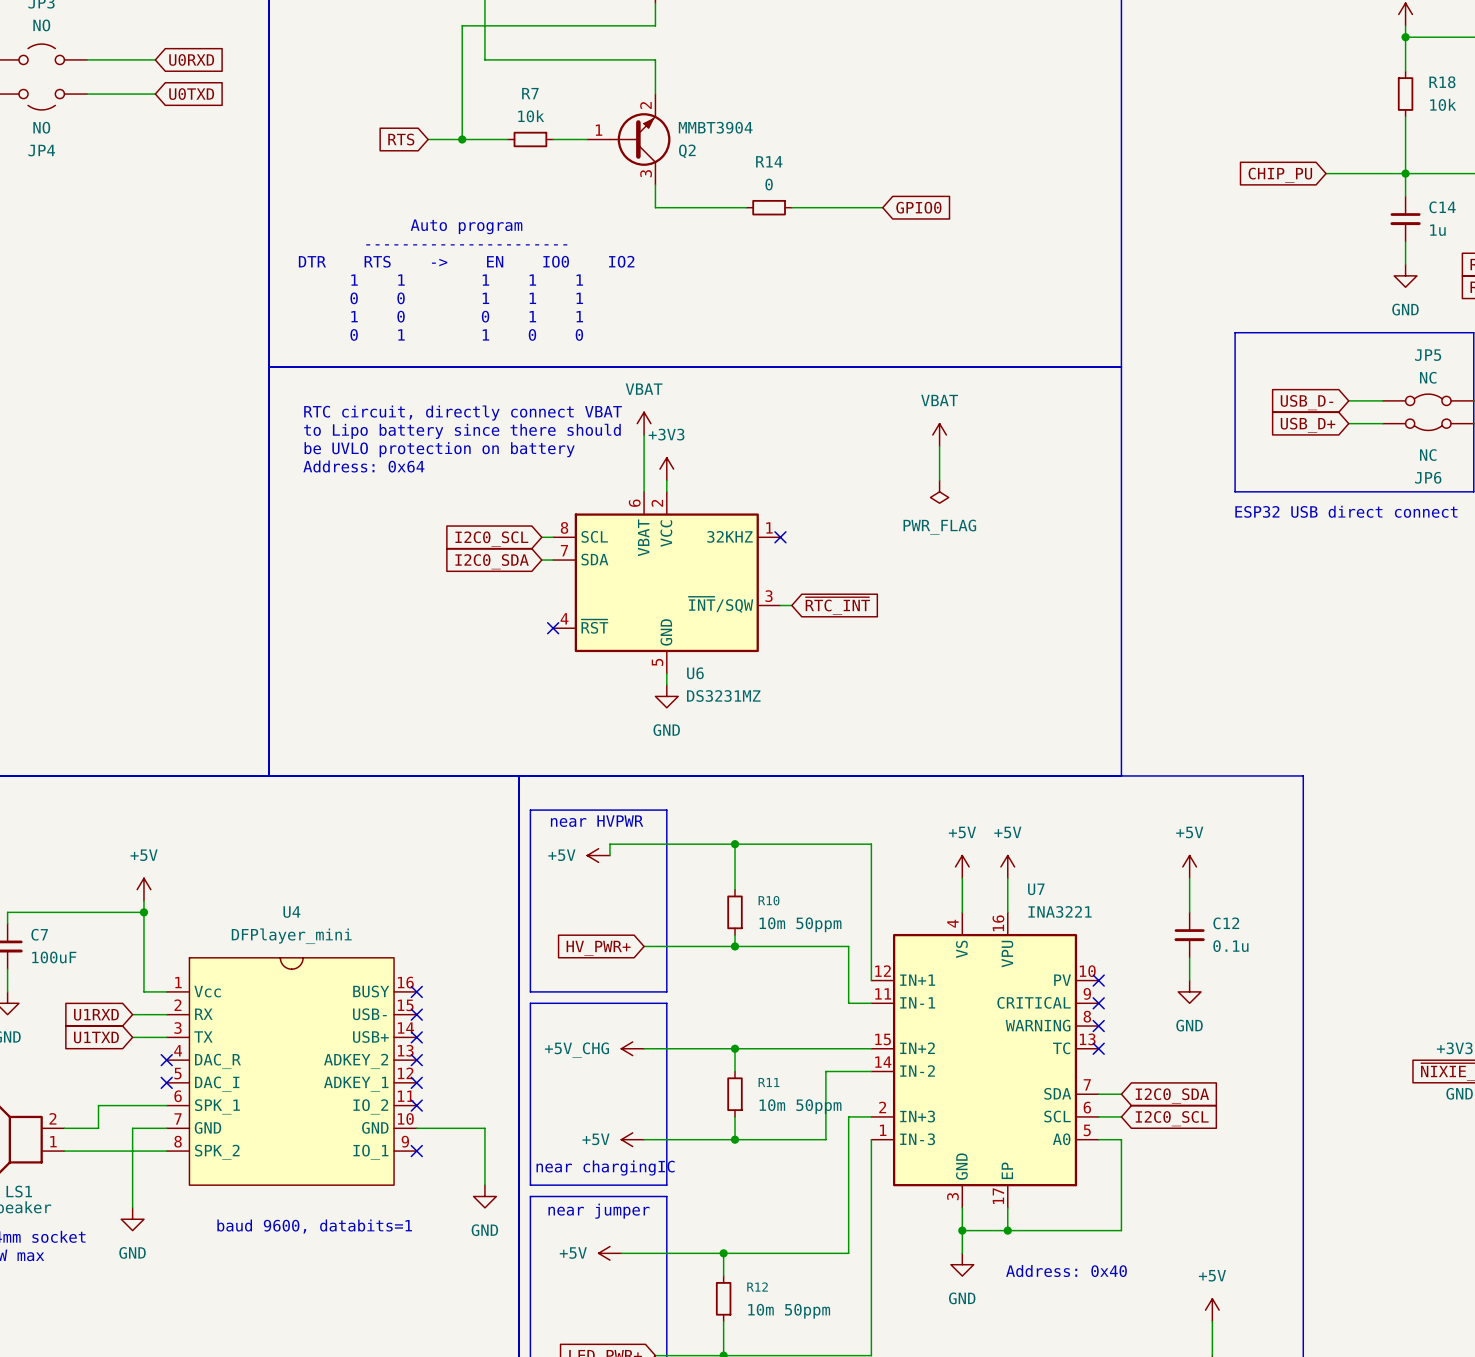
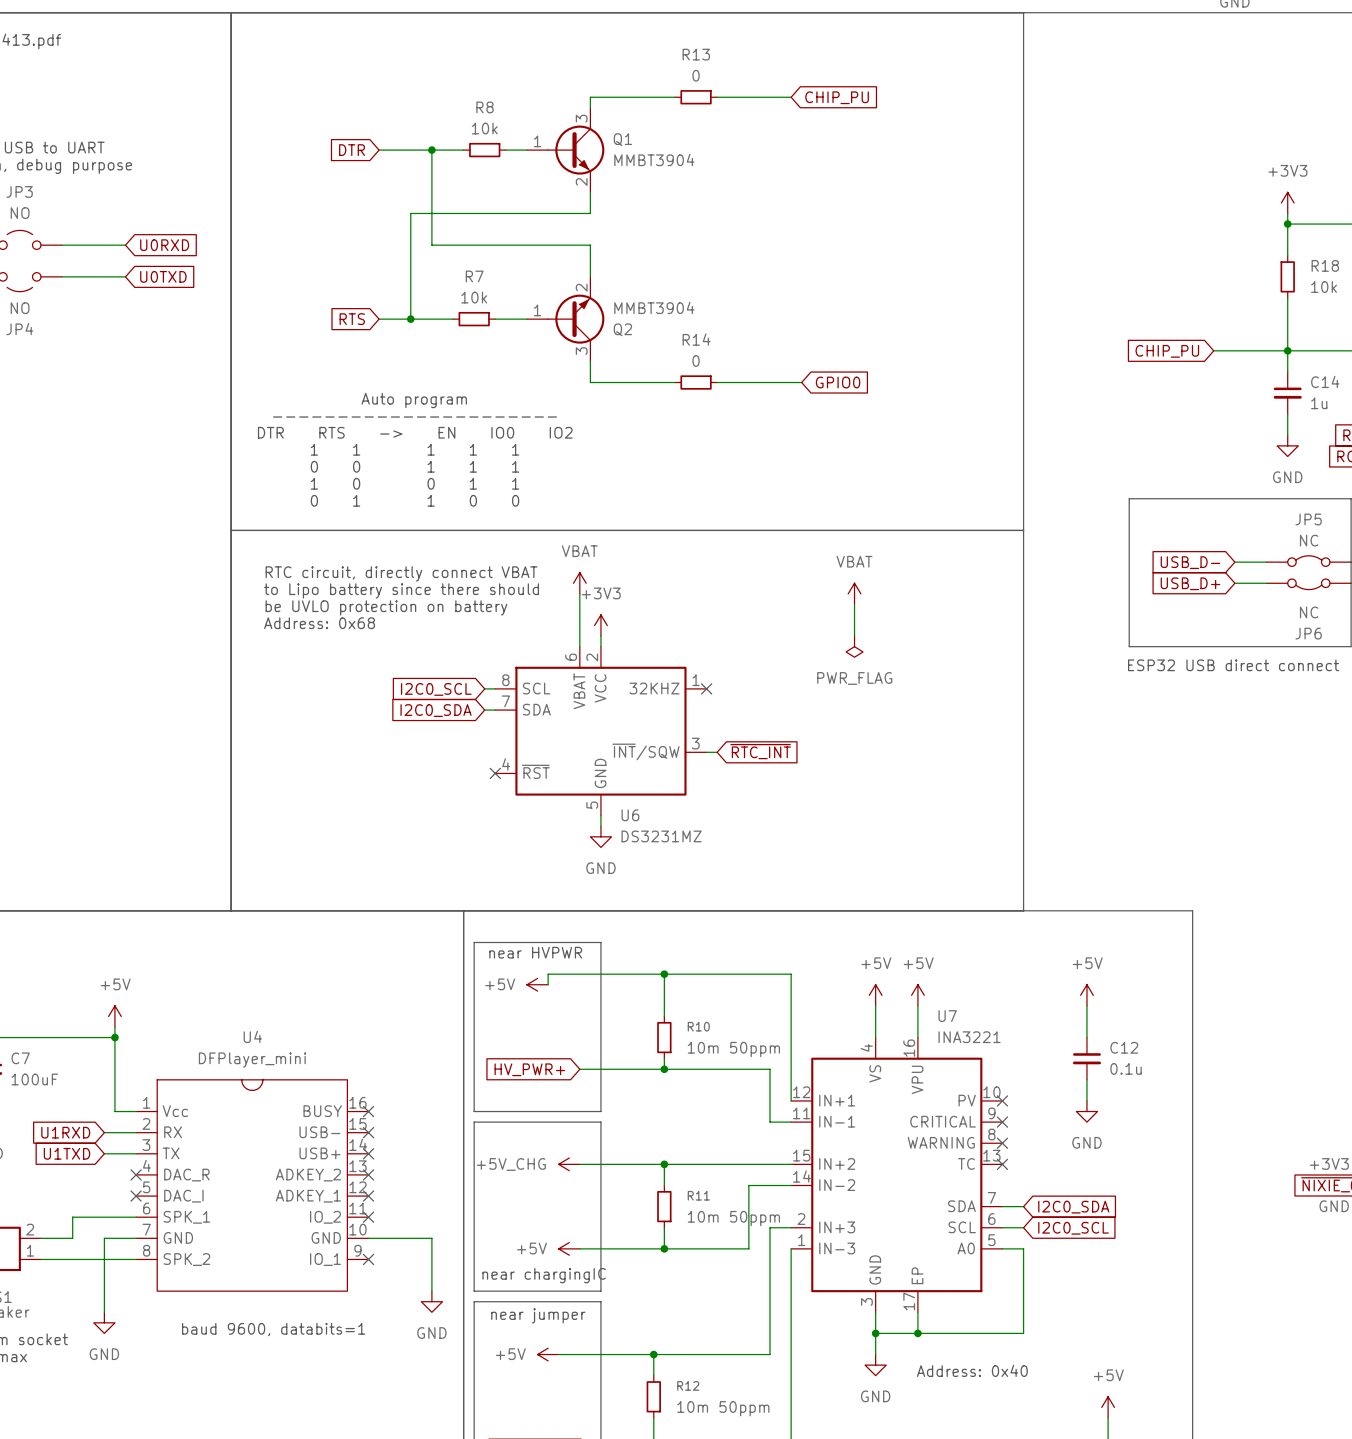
text: Address: 0x64 (363, 466) -> Address: 0x68 (319, 623)

